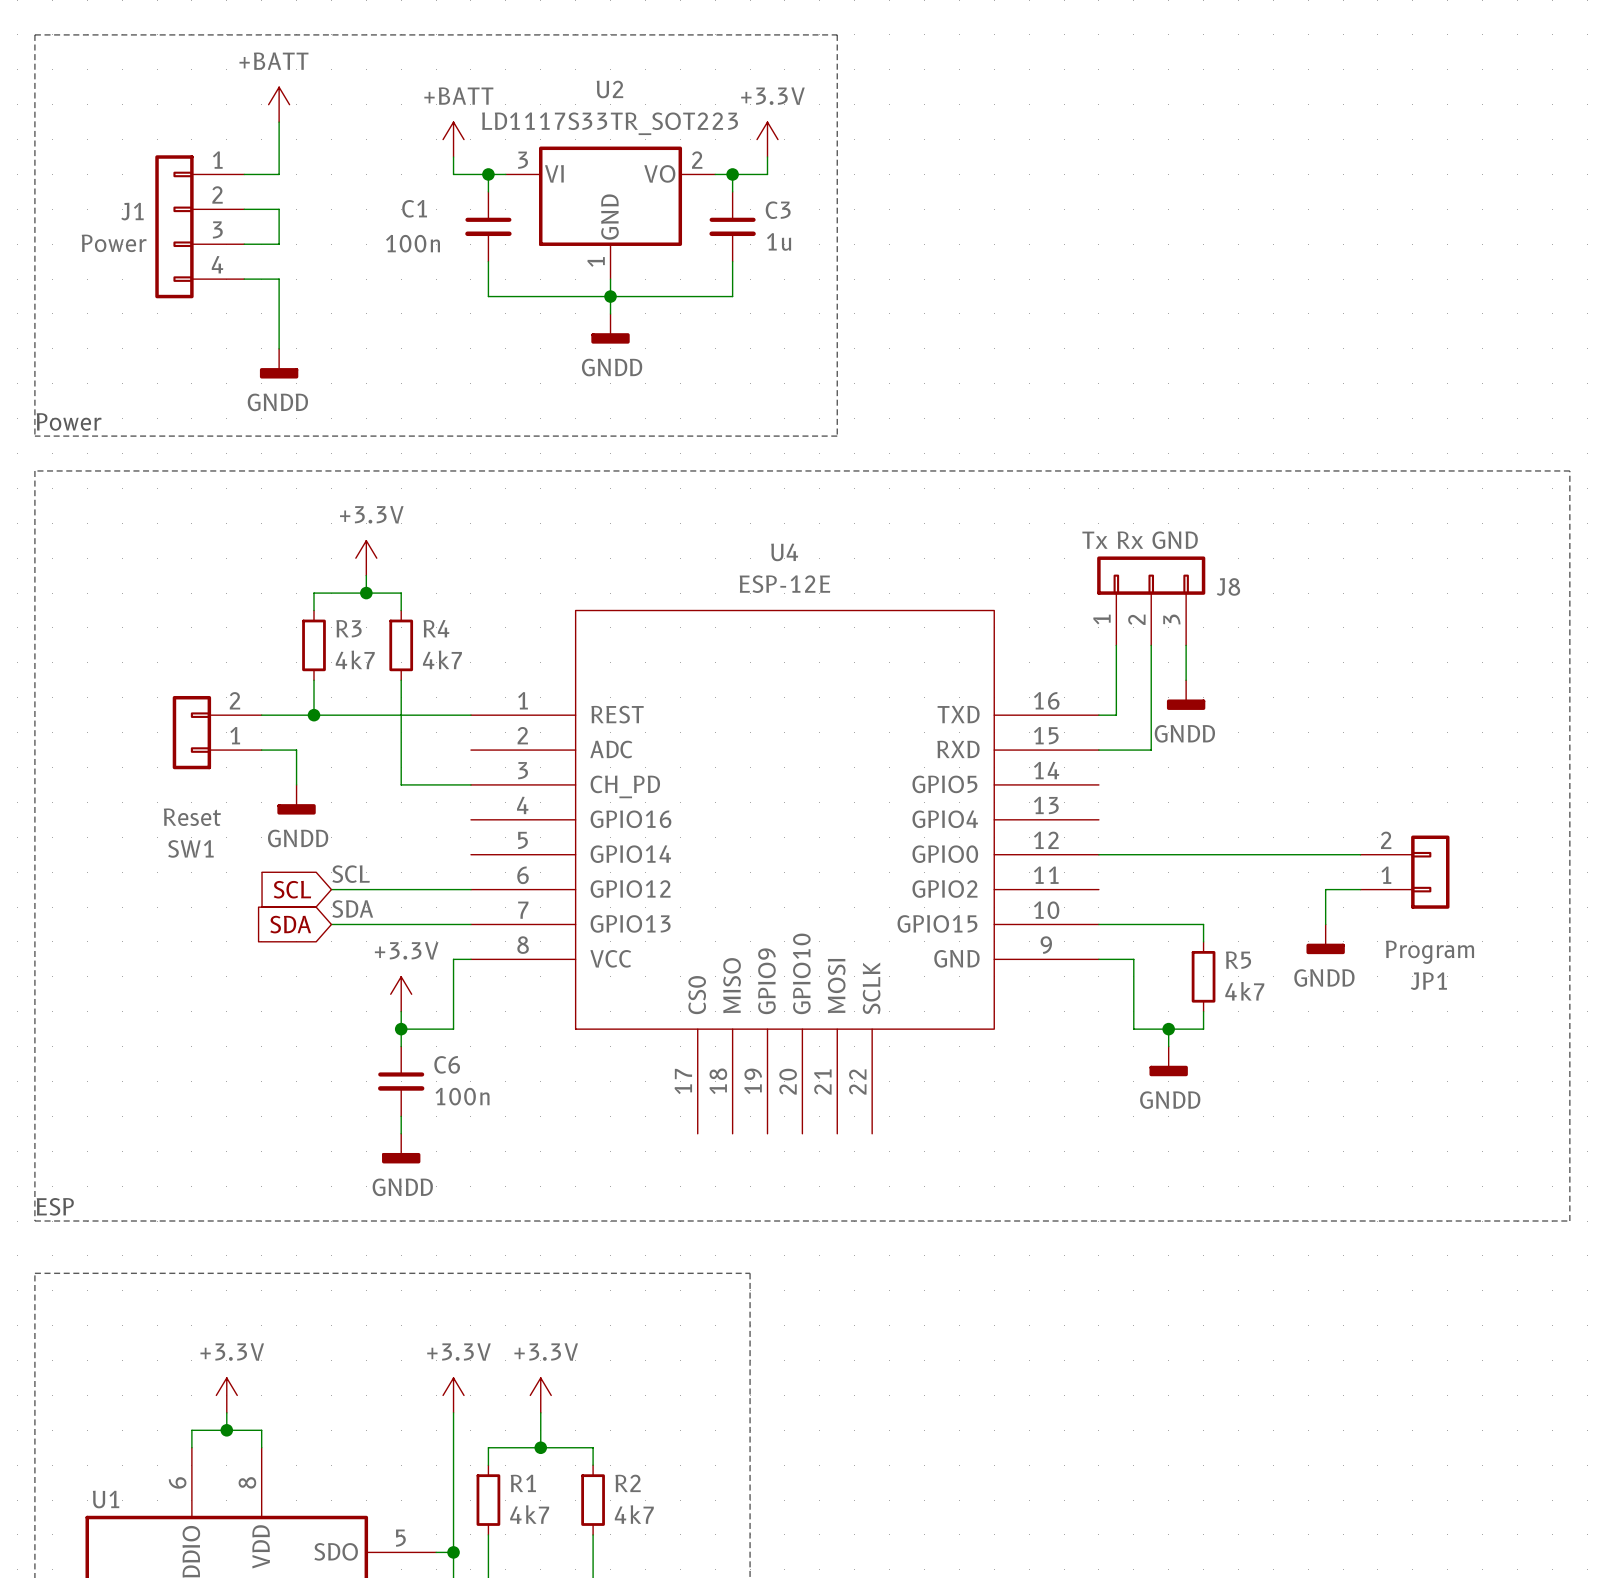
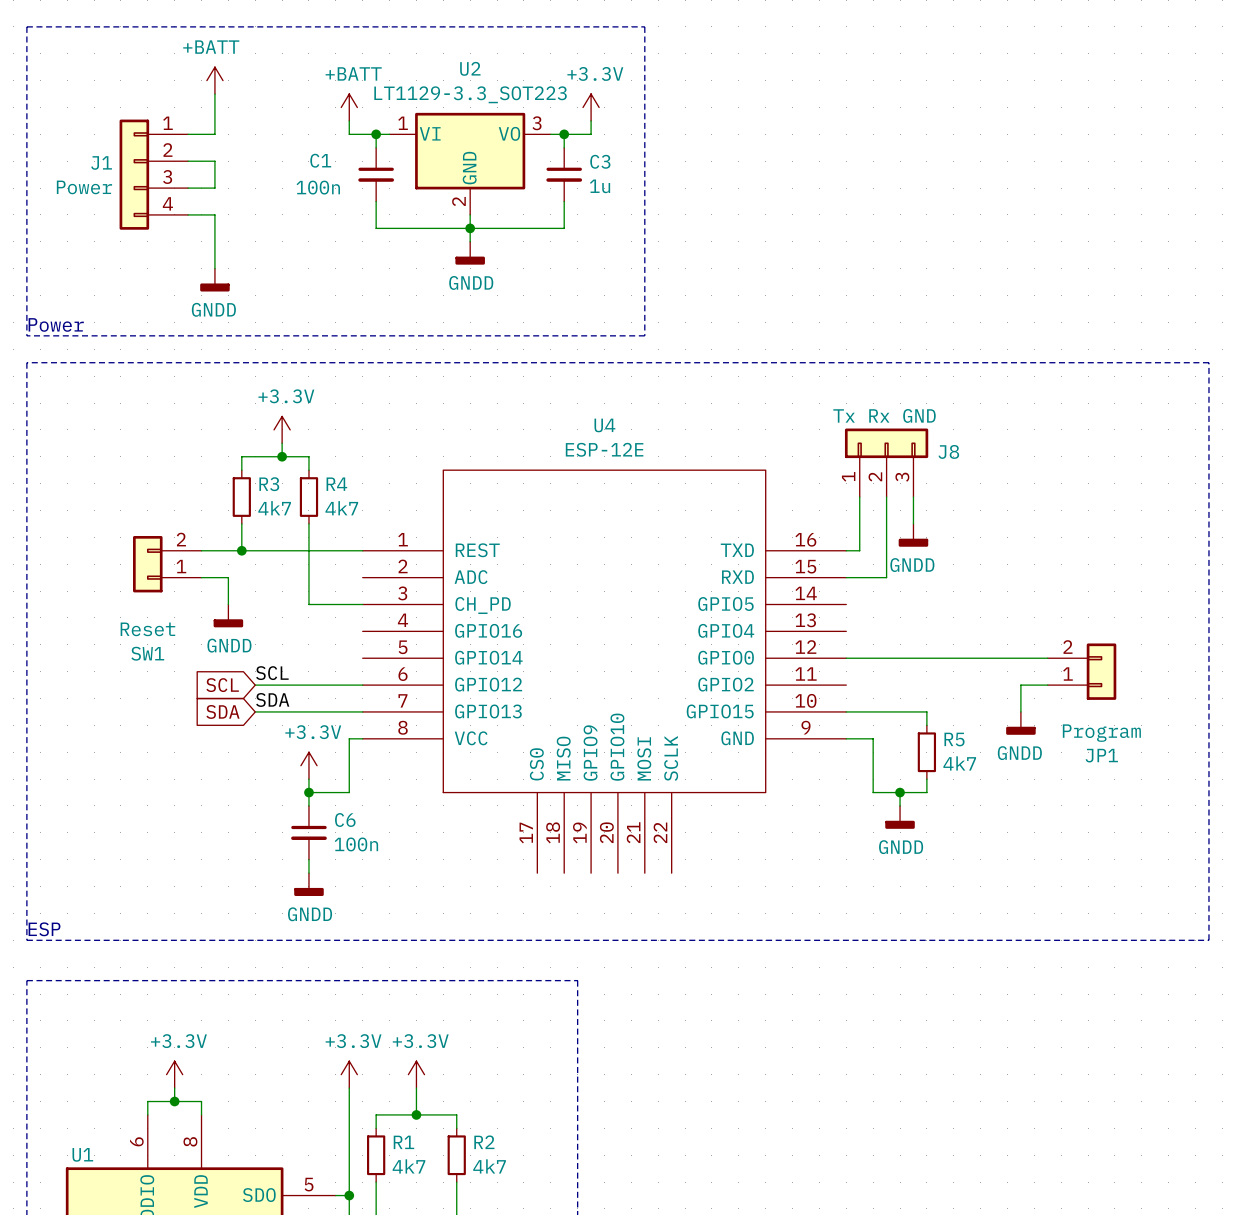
U2 value: LD1117S33TR_SOT223 (610, 123) -> LT1129-3.3_SOT223 (470, 94)
U2 pin number: 3 (523, 160) -> 1 (403, 123)
U2 pin number: 2 (697, 160) -> 3 (537, 123)
U2 pin number: 1 (596, 261) -> 2 (458, 201)

